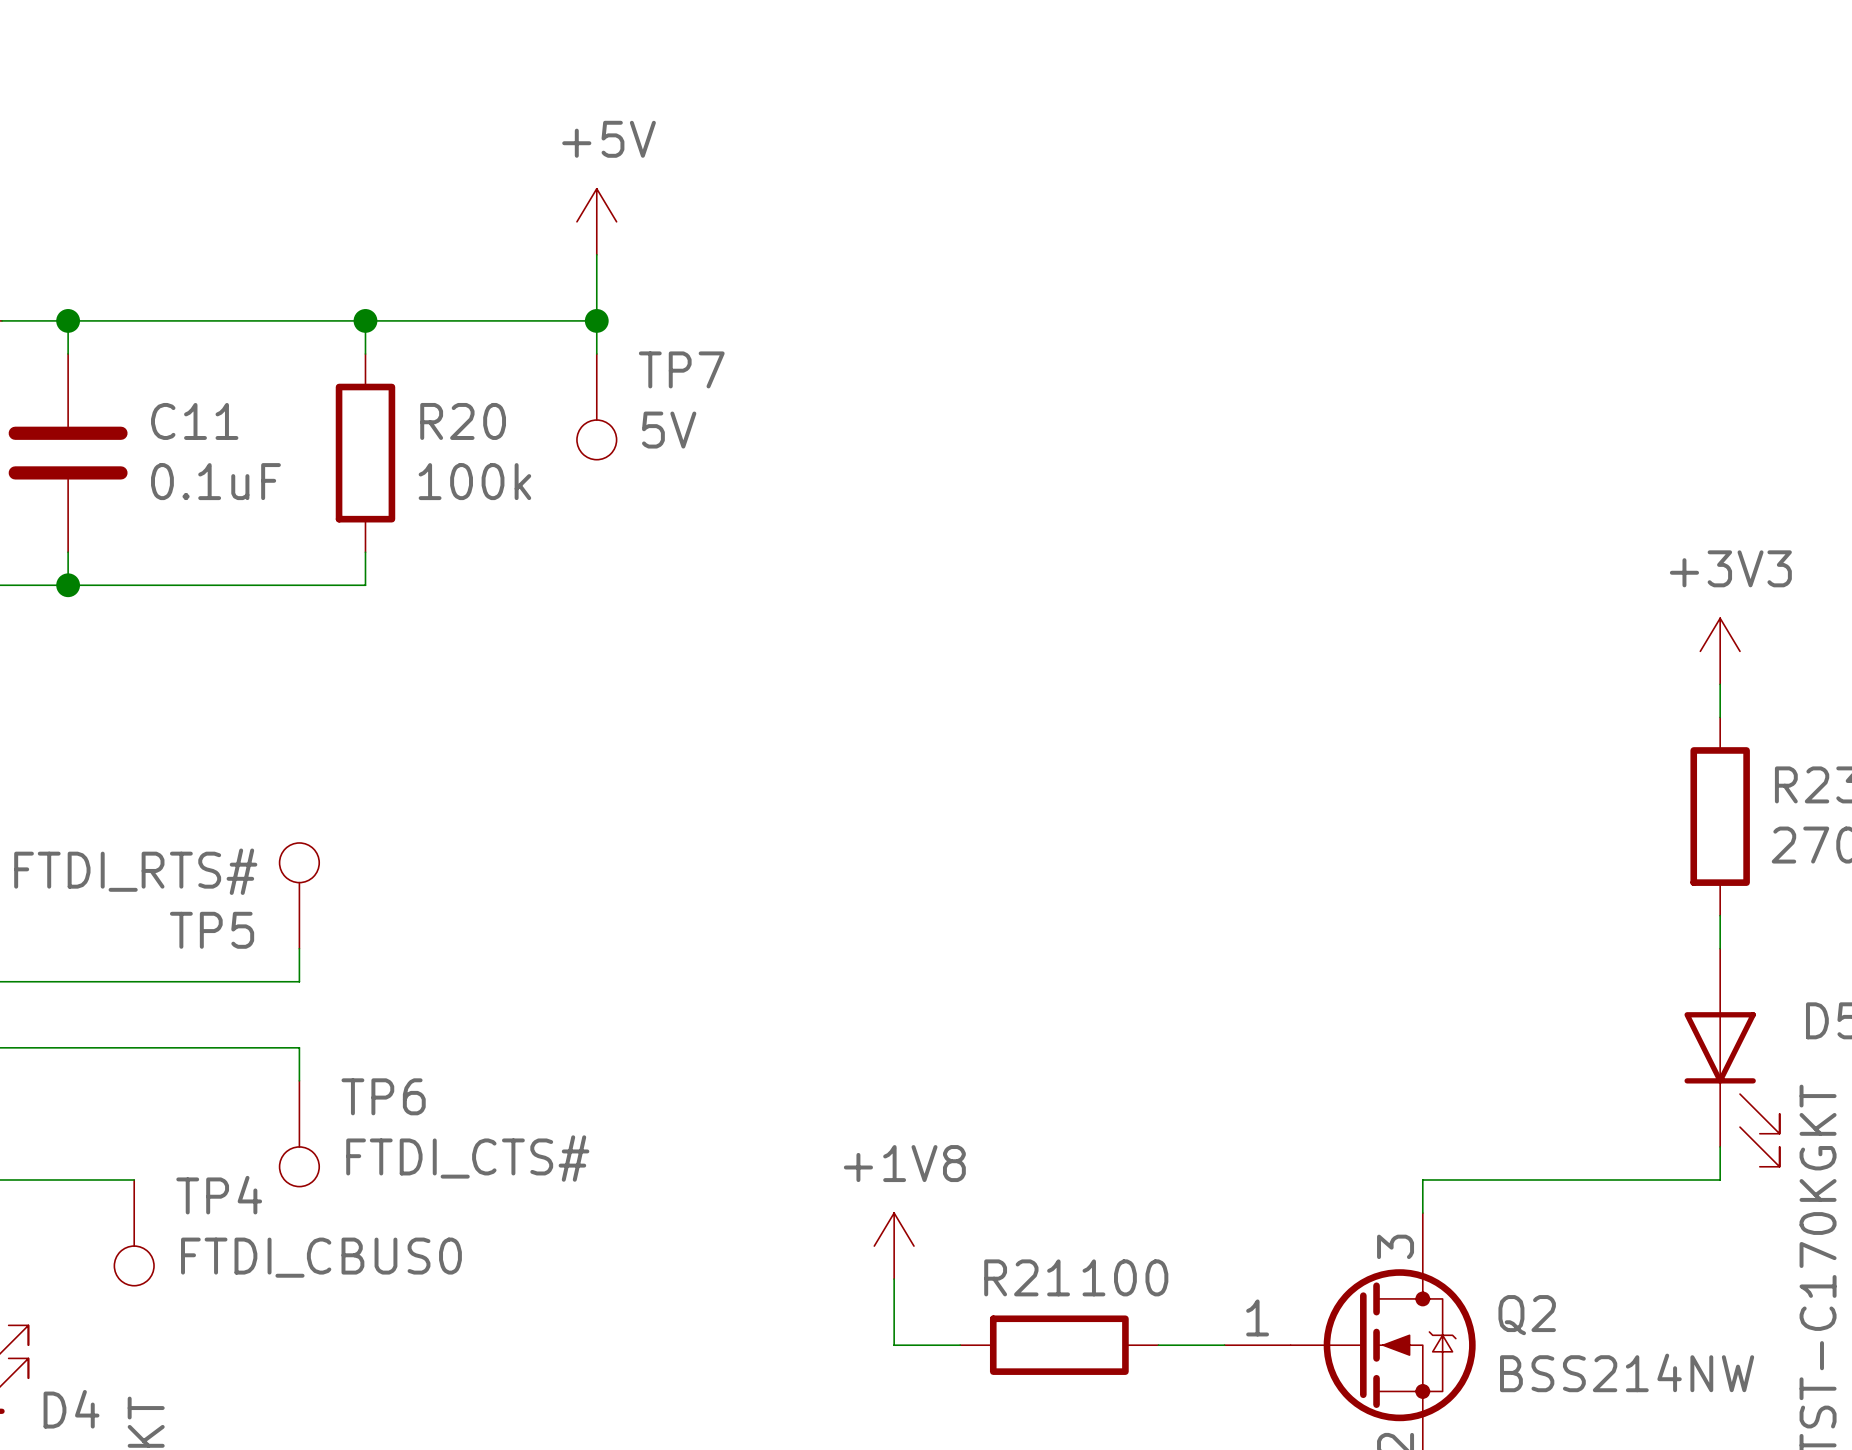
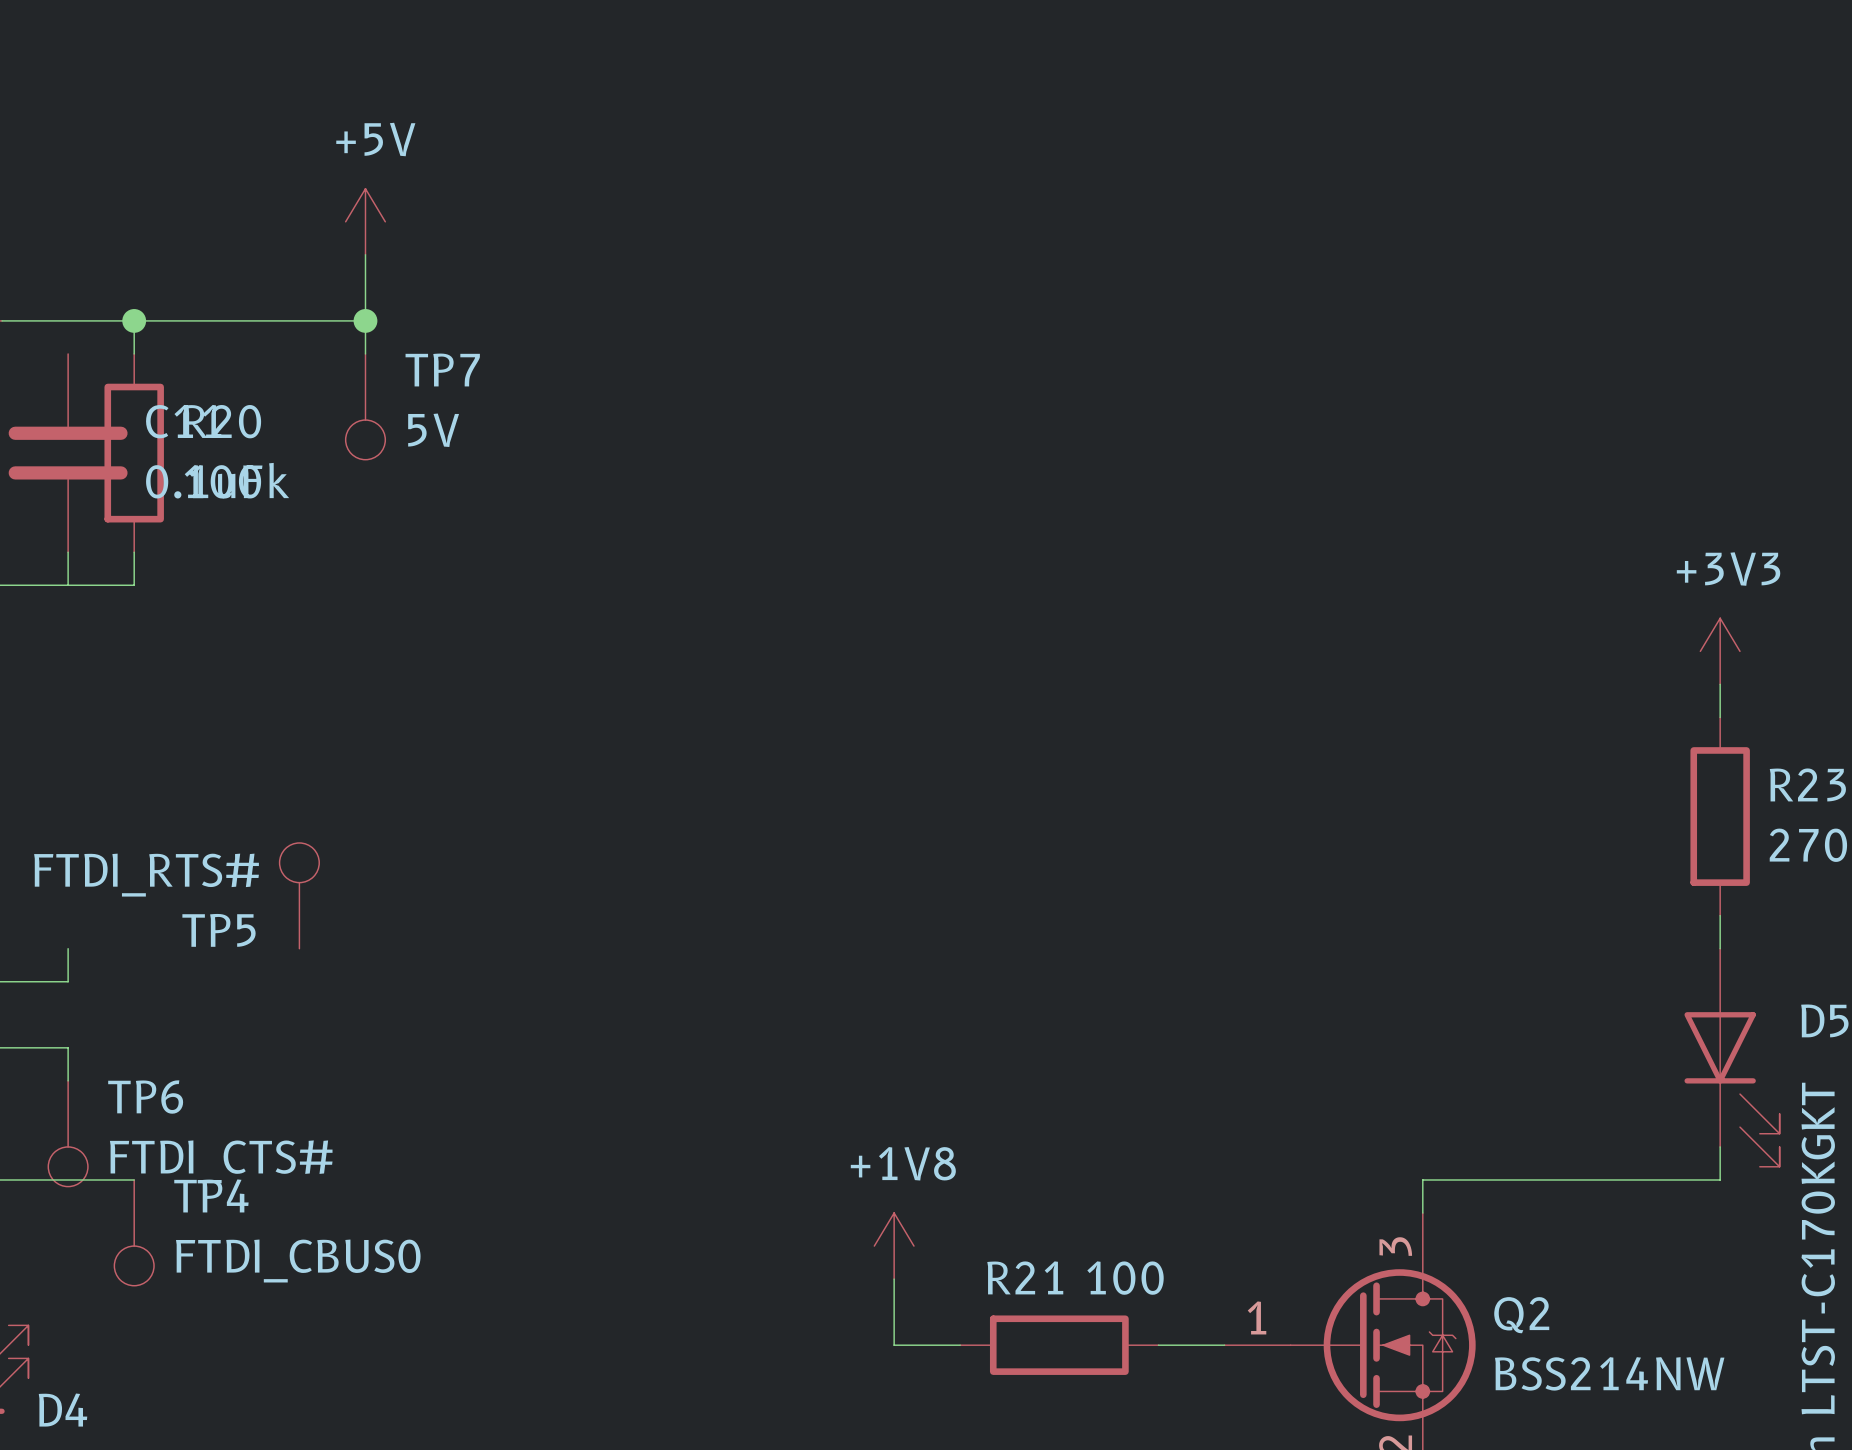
power symbol position: +5V (596, 221) -> +5V (365, 221)
wire: (596, 254) (596, 353) -> none
wire: (68, 320) (68, 353) -> (134, 320) (134, 353)
junction position: (68, 320) -> (134, 320)
wire: (365, 320) (596, 320) -> (365, 320) (365, 254)
junction: (596, 320) -> none
TP7 position: (596, 406) -> (365, 406)
R20 position: (365, 453) -> (134, 453)
wire: (365, 552) (365, 585) (134, 585) -> (134, 552) (134, 585)
junction: (68, 585) -> none
wire: (299, 948) (299, 981) (68, 981) -> (68, 948) (68, 981)
wire: (68, 1047) (299, 1047) (299, 1080) -> (68, 1047) (68, 1080)
TP6 position: (299, 1133) -> (68, 1133)

